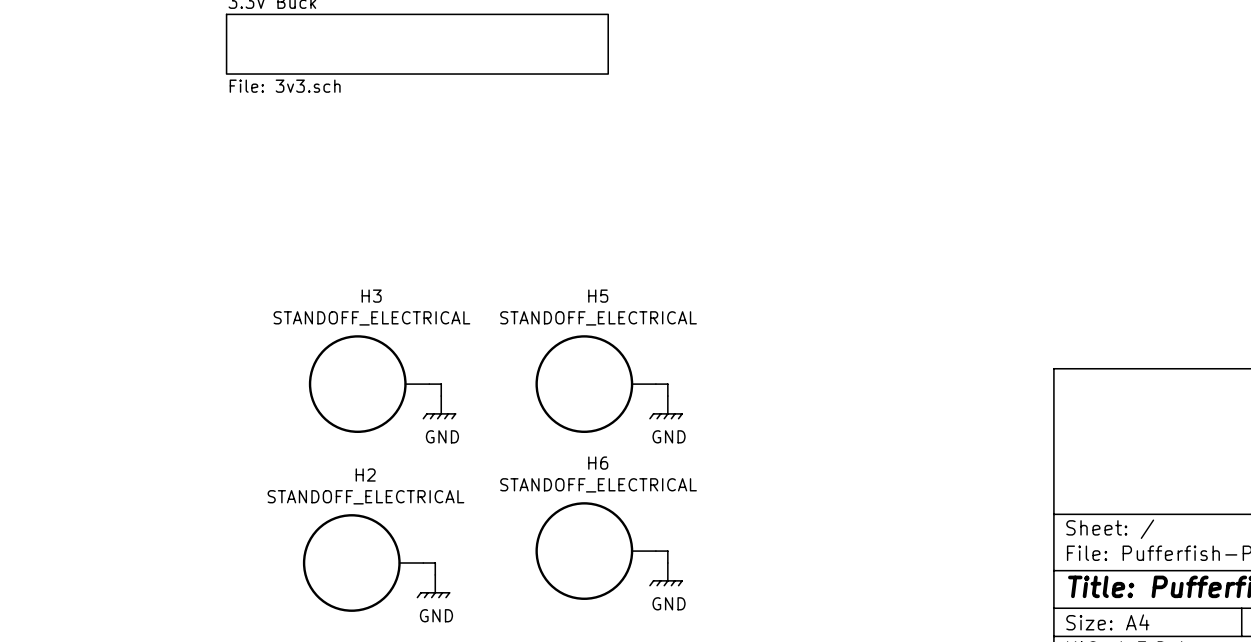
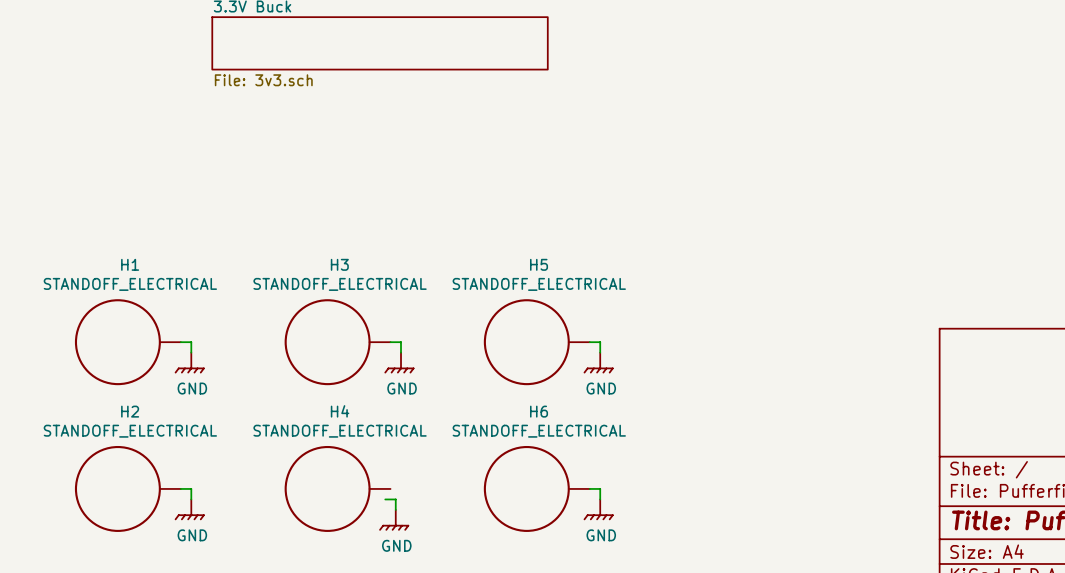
H1: none -> STANDOFF_ELECTRICAL (127, 342)
wire: none -> (180, 342) (191, 342) (191, 352)
power symbol: none -> GND (189, 362)
wire: none -> (180, 488) (191, 488) (191, 499)
H4: none -> STANDOFF_ELECTRICAL (337, 488)
H2 position: (363, 563) -> (127, 488)
power symbol: none -> GND (189, 509)

